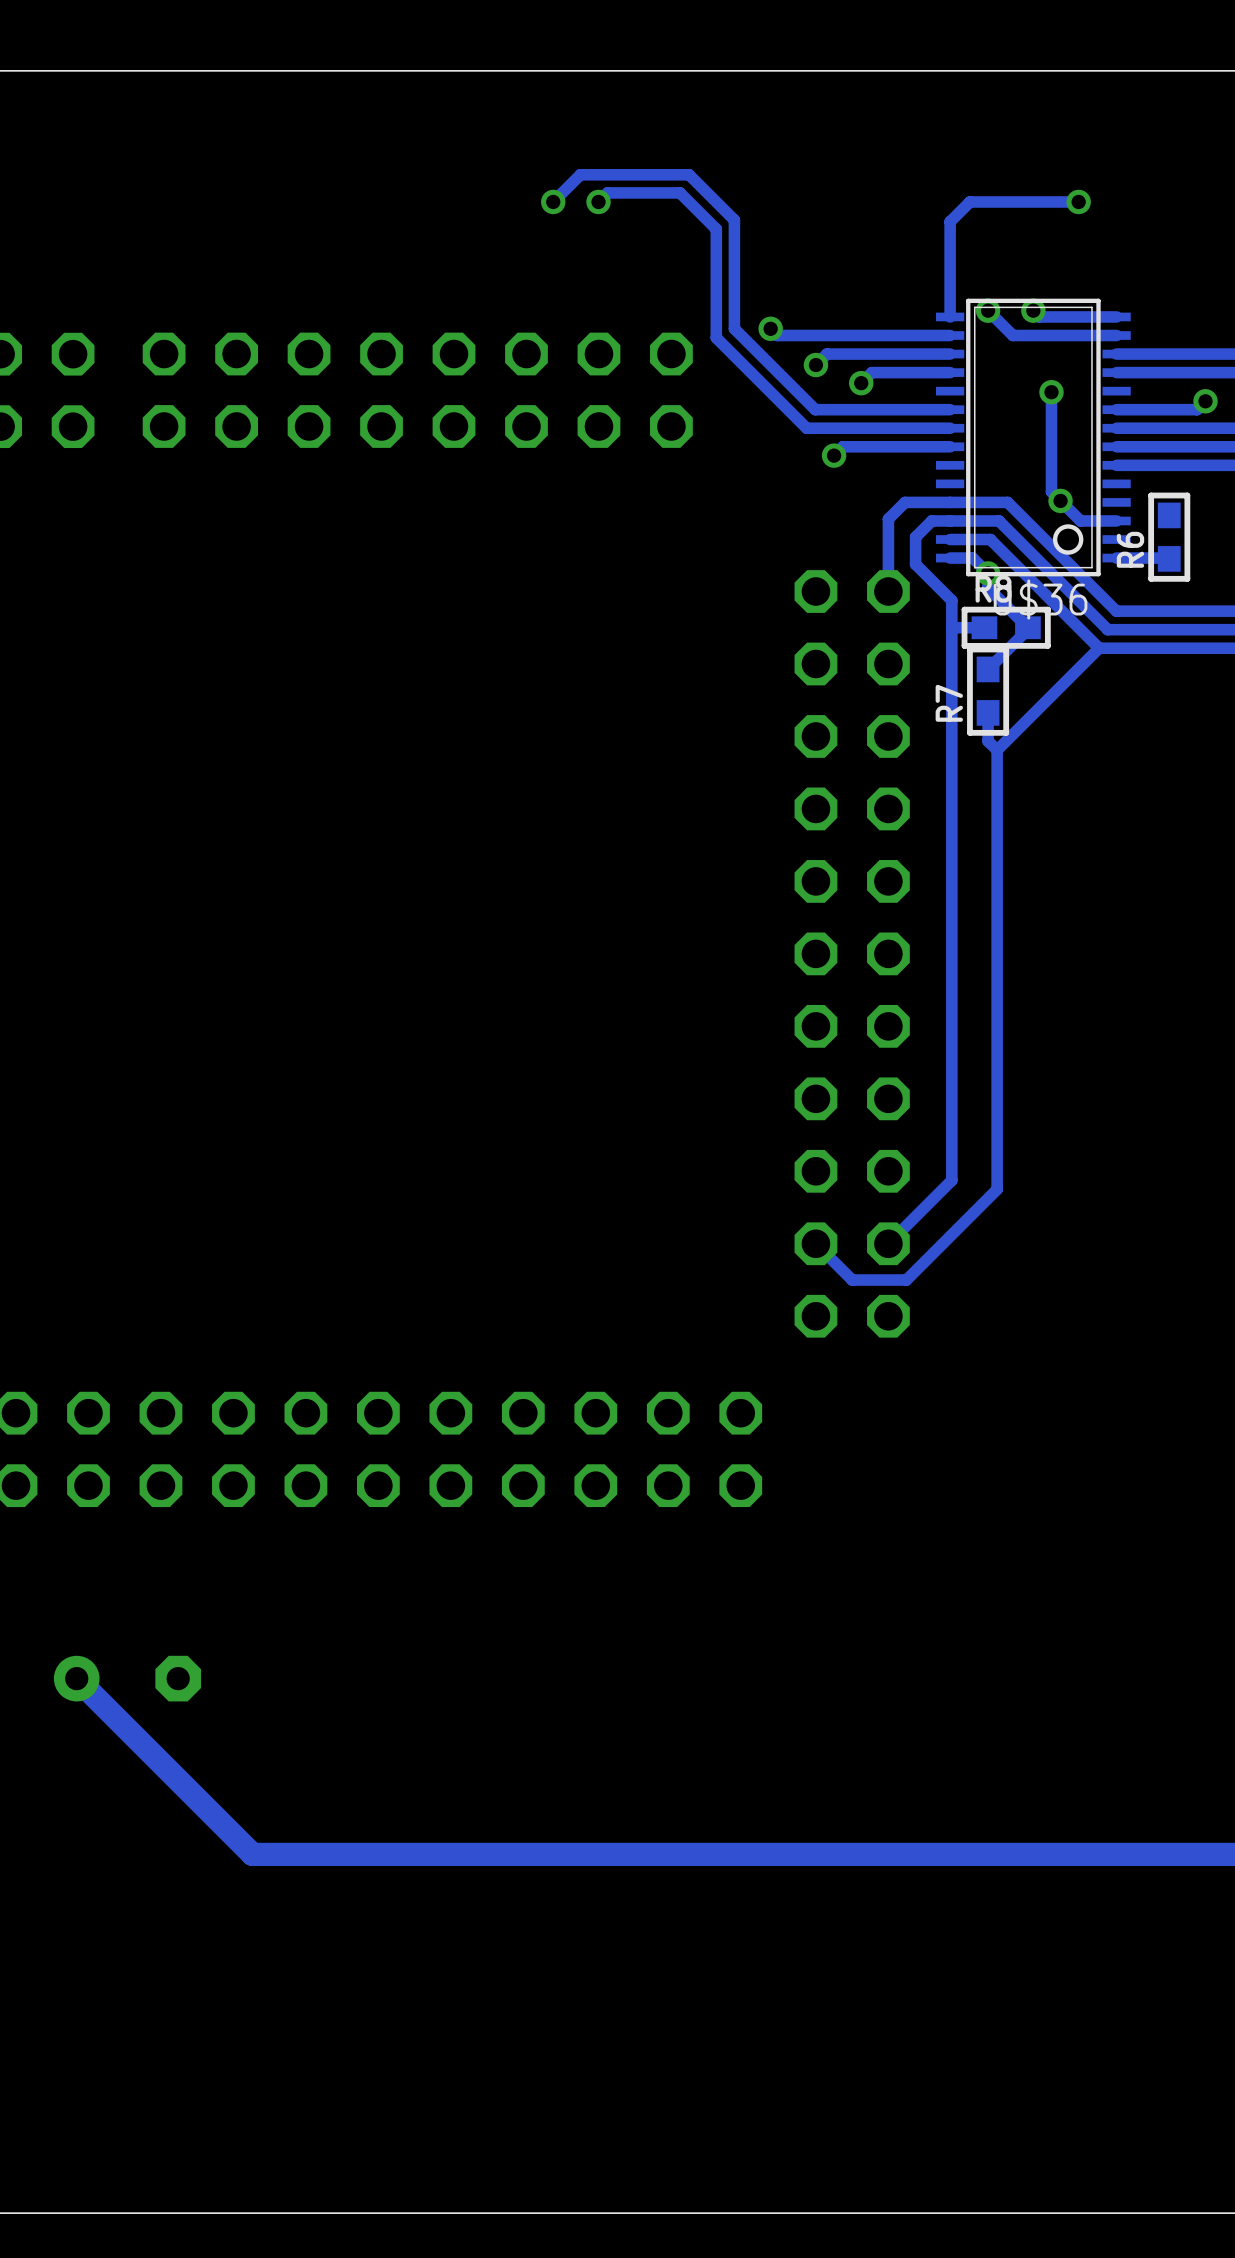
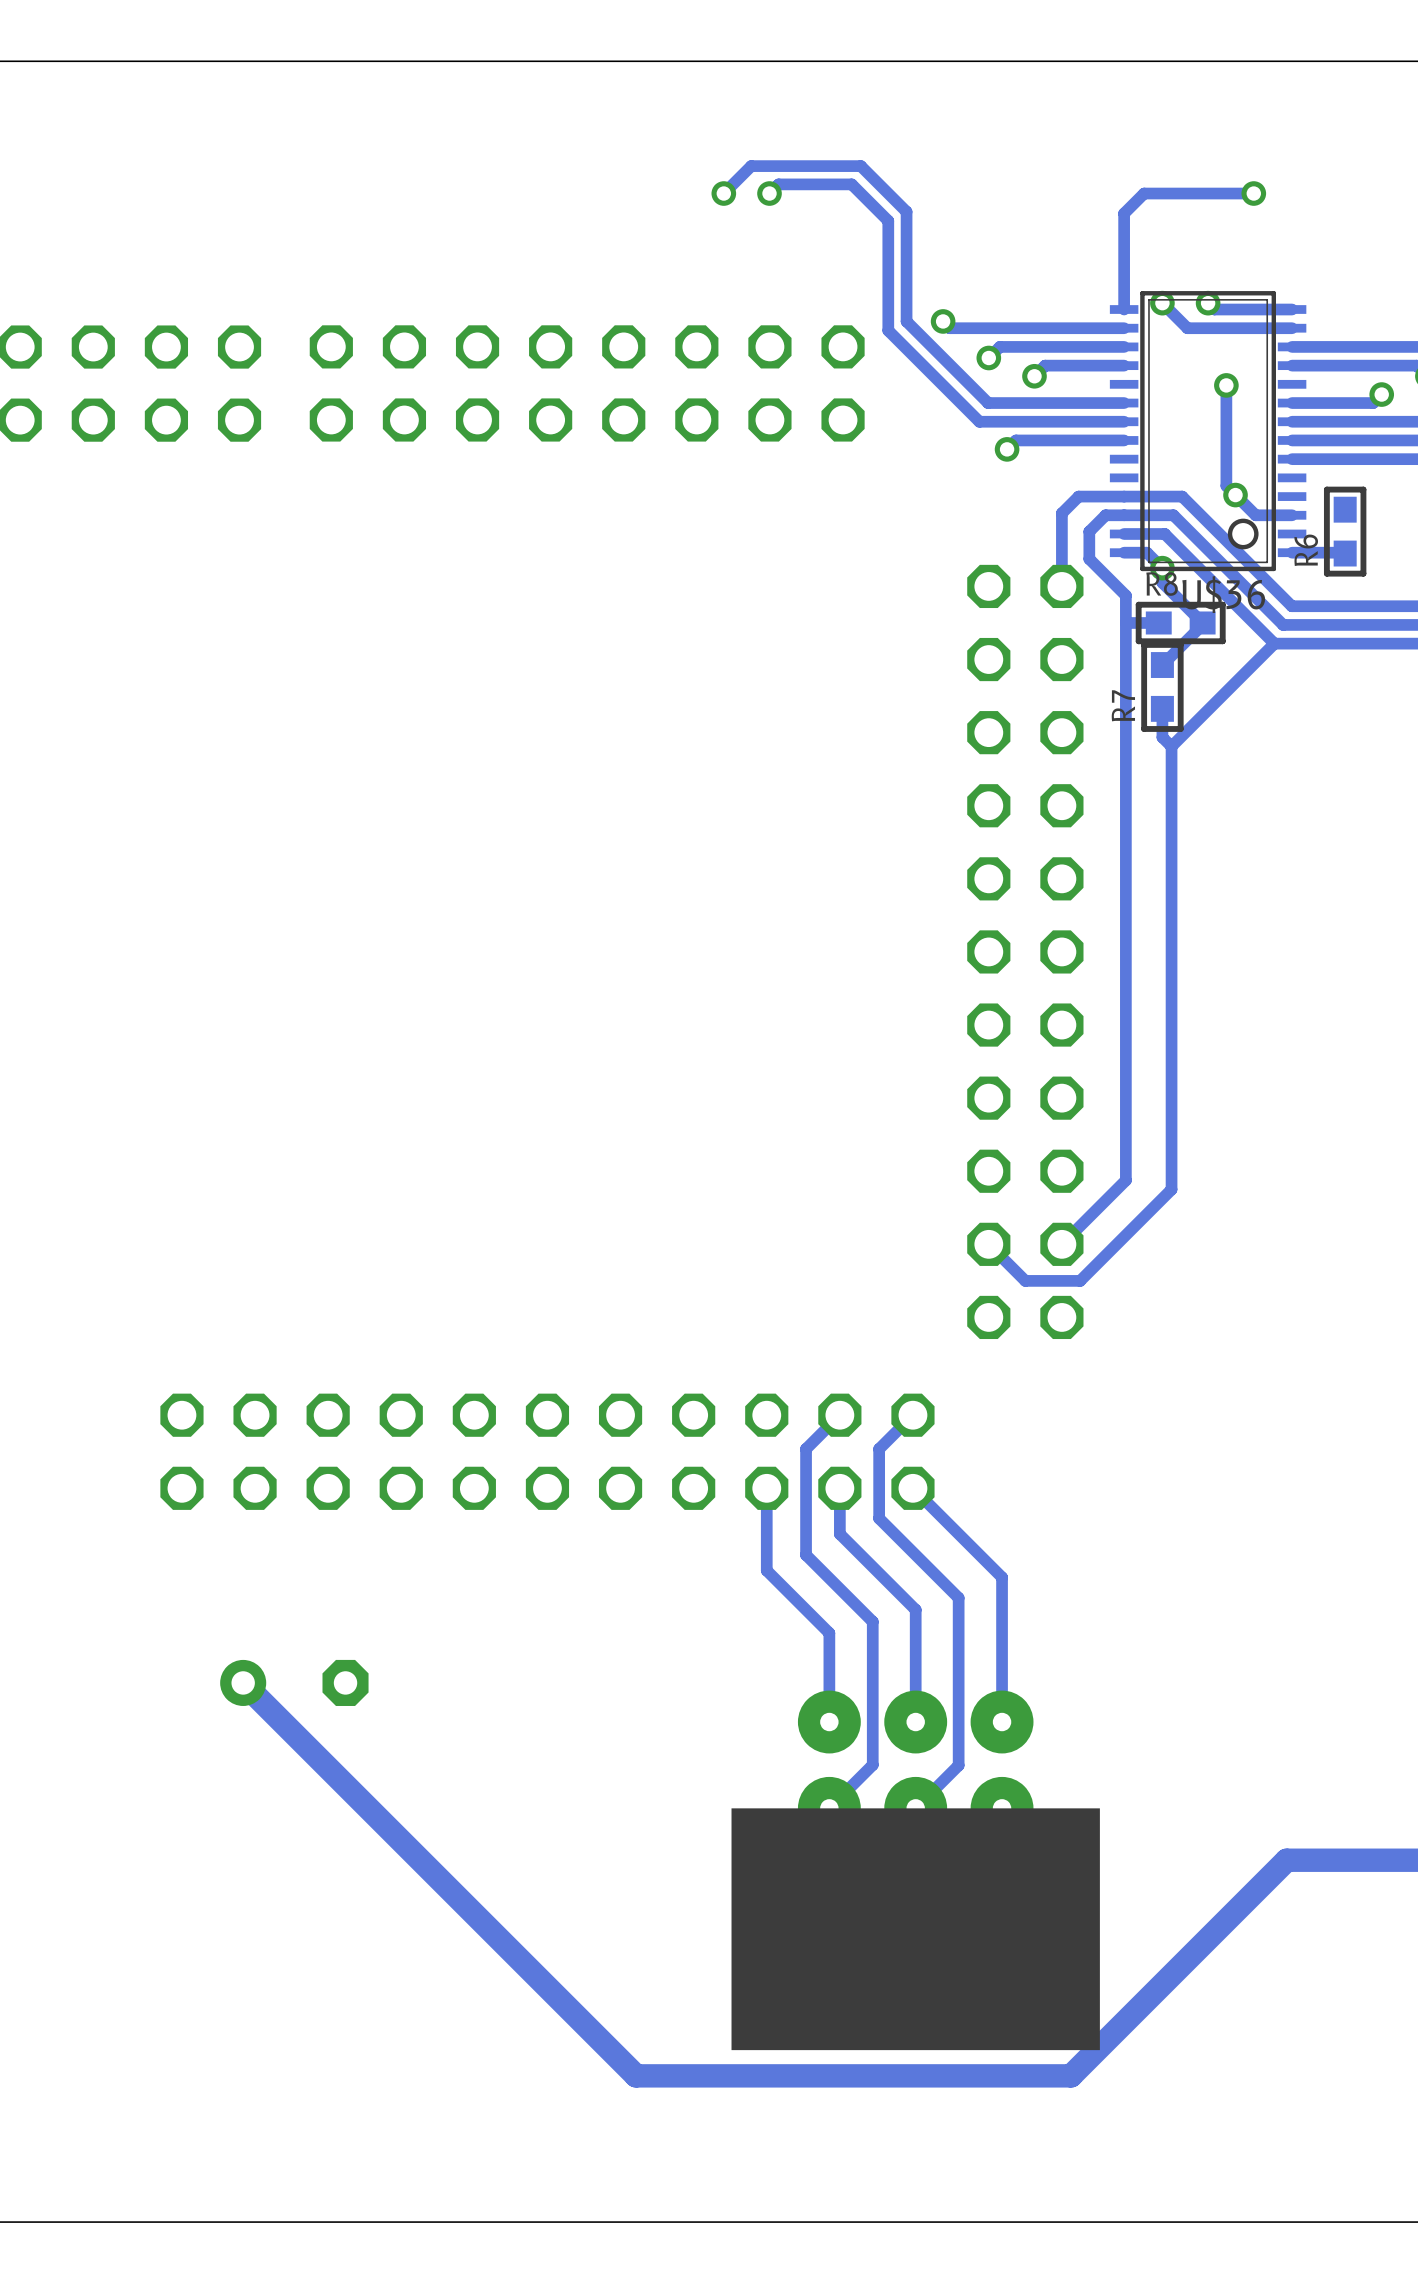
track: none -> (839, 1415) (806, 1449) (806, 1555) (872, 1621) (872, 1764) (829, 1808)
track: none -> (912, 1415) (879, 1449) (879, 1518) (958, 1597) (958, 1765) (915, 1808)
track: none -> (766, 1488) (766, 1570) (829, 1633) (829, 1722)
track: none -> (839, 1488) (839, 1534) (915, 1609) (915, 1722)
track: none -> (912, 1488) (1002, 1577) (1002, 1722)
track: (1111, 1854) (252, 1854) -> (1286, 1860) (1071, 2075) (636, 2075) (420, 1860)
part: none -> (915, 1870)

